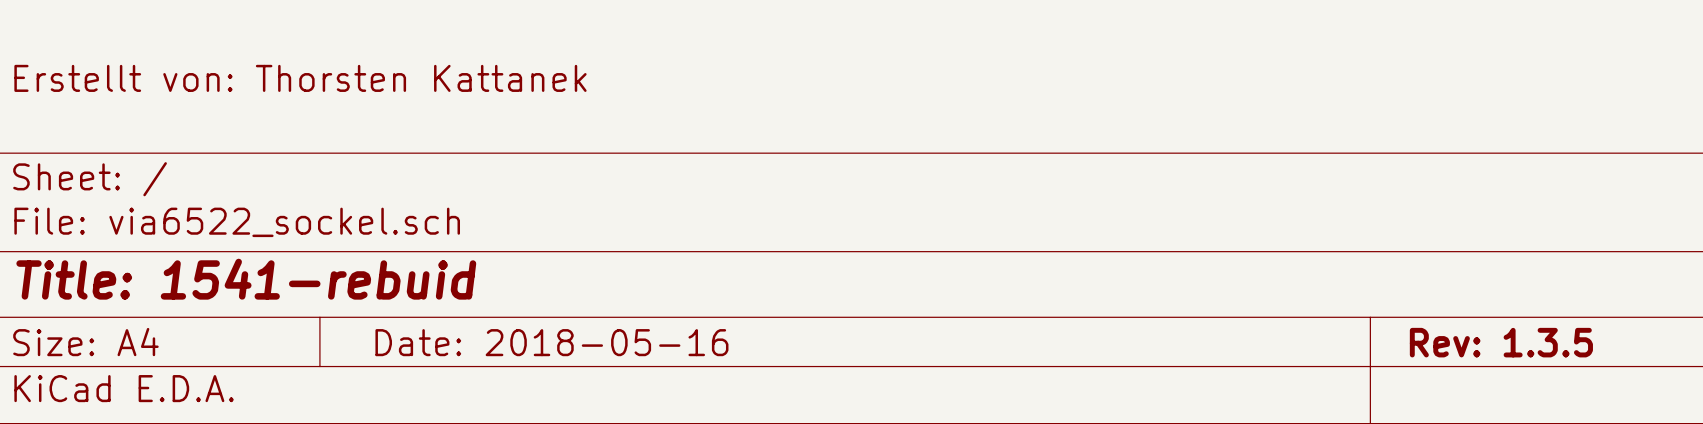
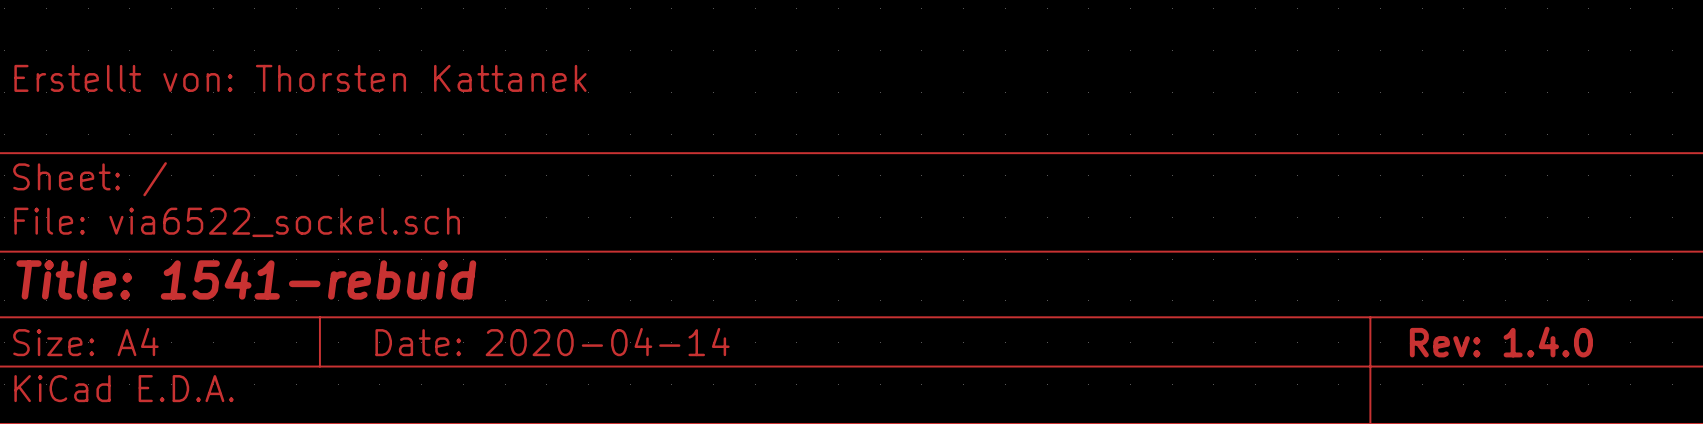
title block: Date: 2018-05-16 (551, 342) -> Date: 2020-04-14 (552, 342)
title block: Rev: 1.3.5 (1501, 342) -> Rev: 1.4.0 (1501, 342)

